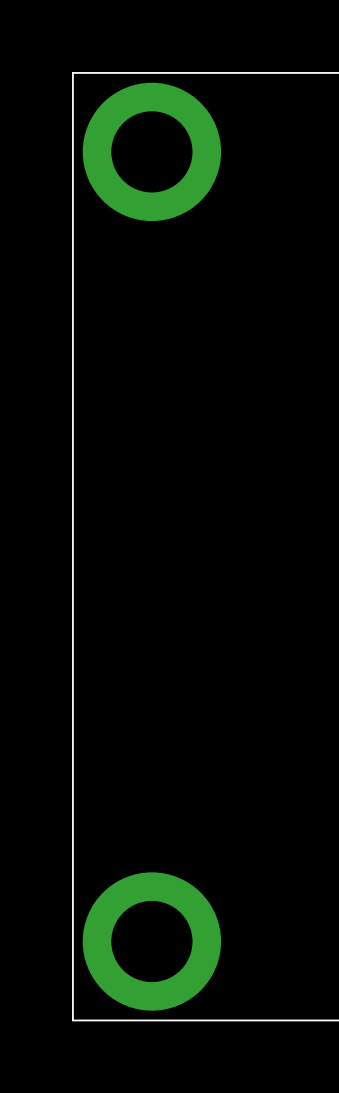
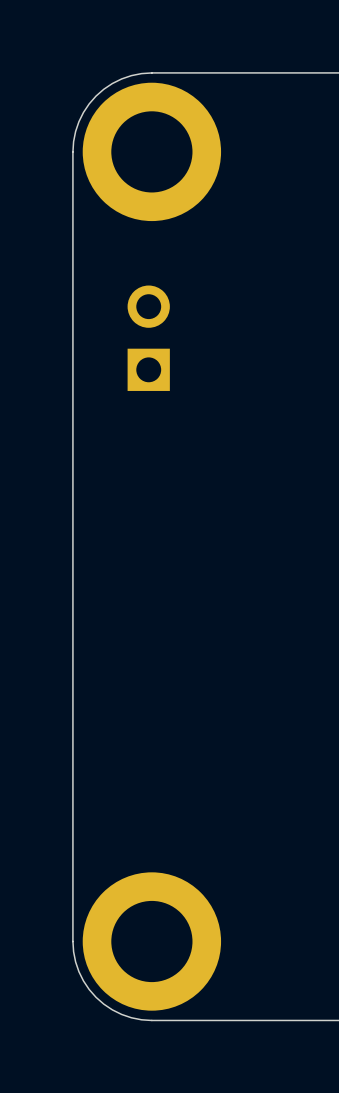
board edge: (151, 72) (72, 72) (72, 151) -> (151, 72) (121, 78) (96, 96) (78, 121) (72, 151)
part: none -> (148, 338)
board edge: (72, 941) (72, 1020) (151, 1020) -> (72, 941) (78, 971) (96, 997) (121, 1014) (151, 1020)

